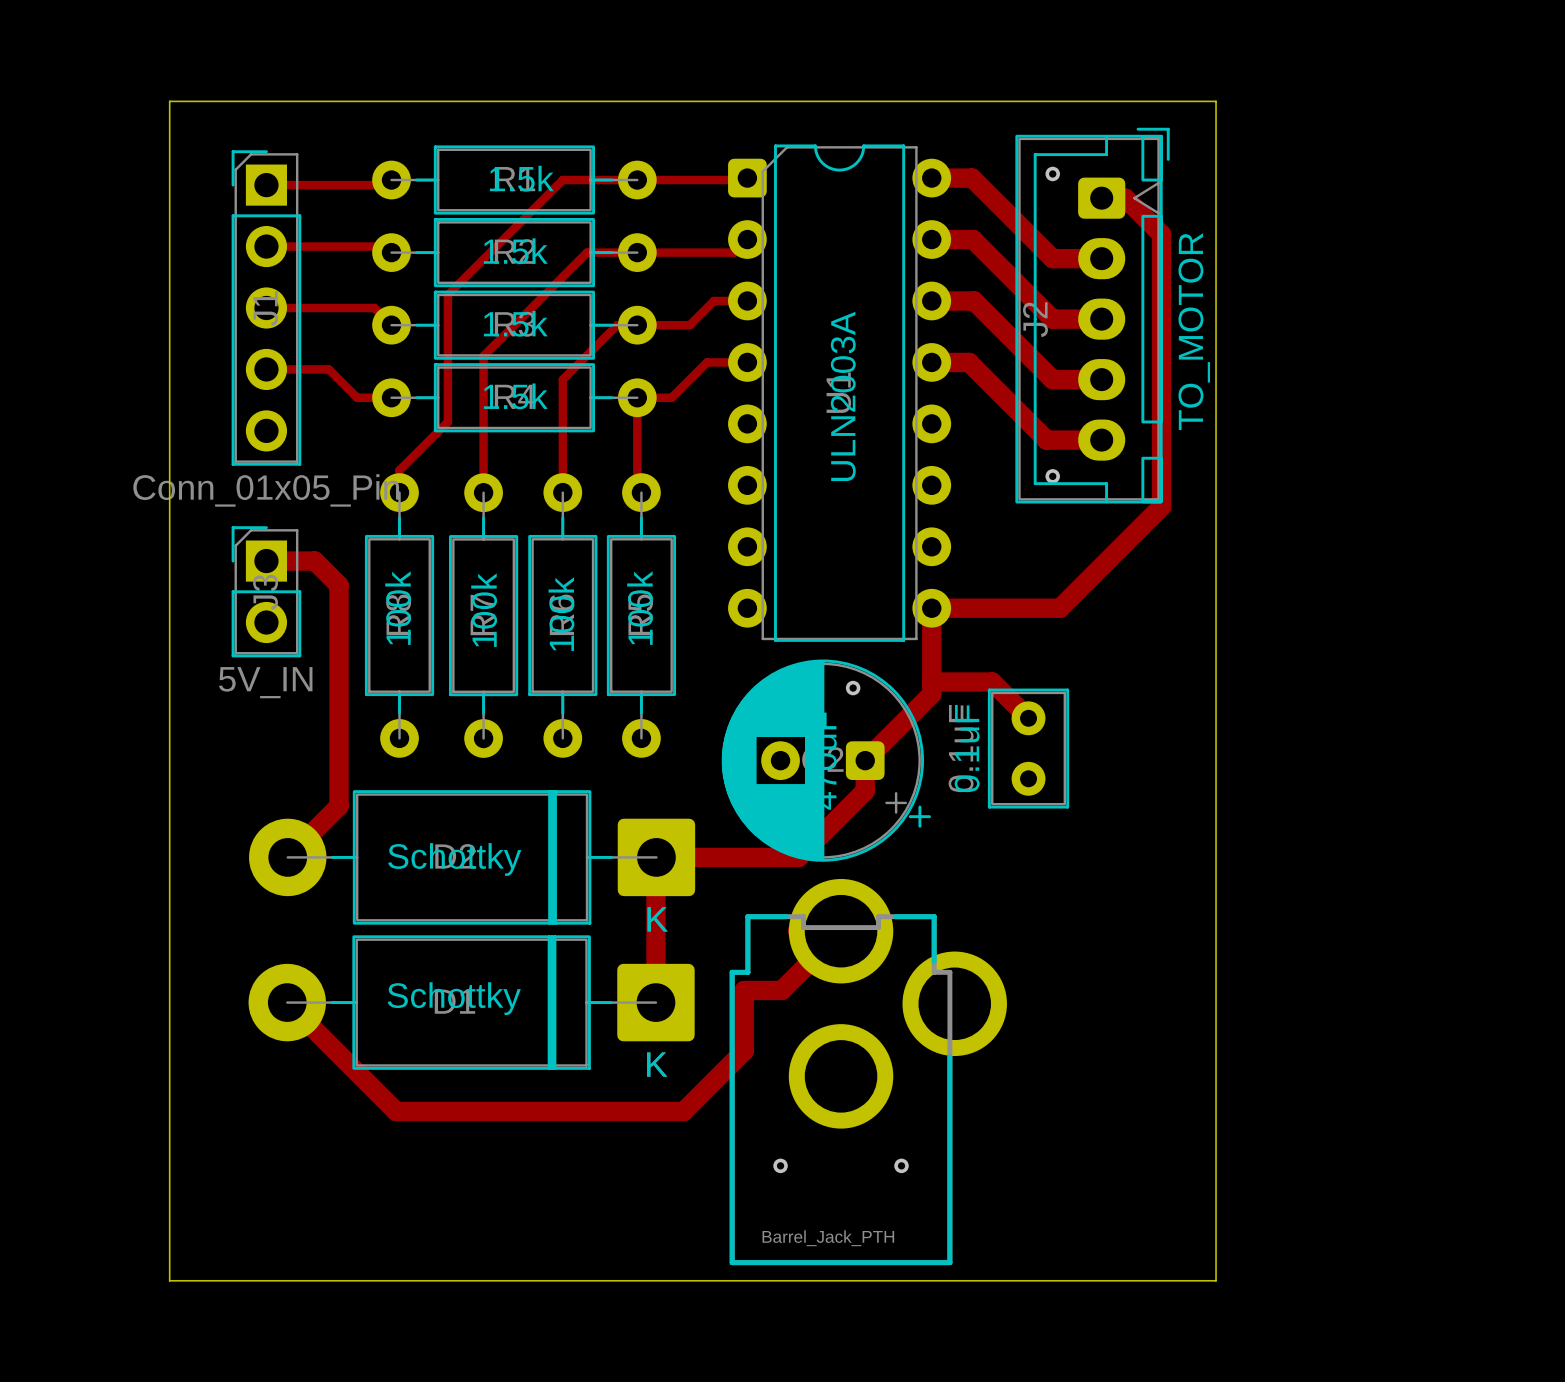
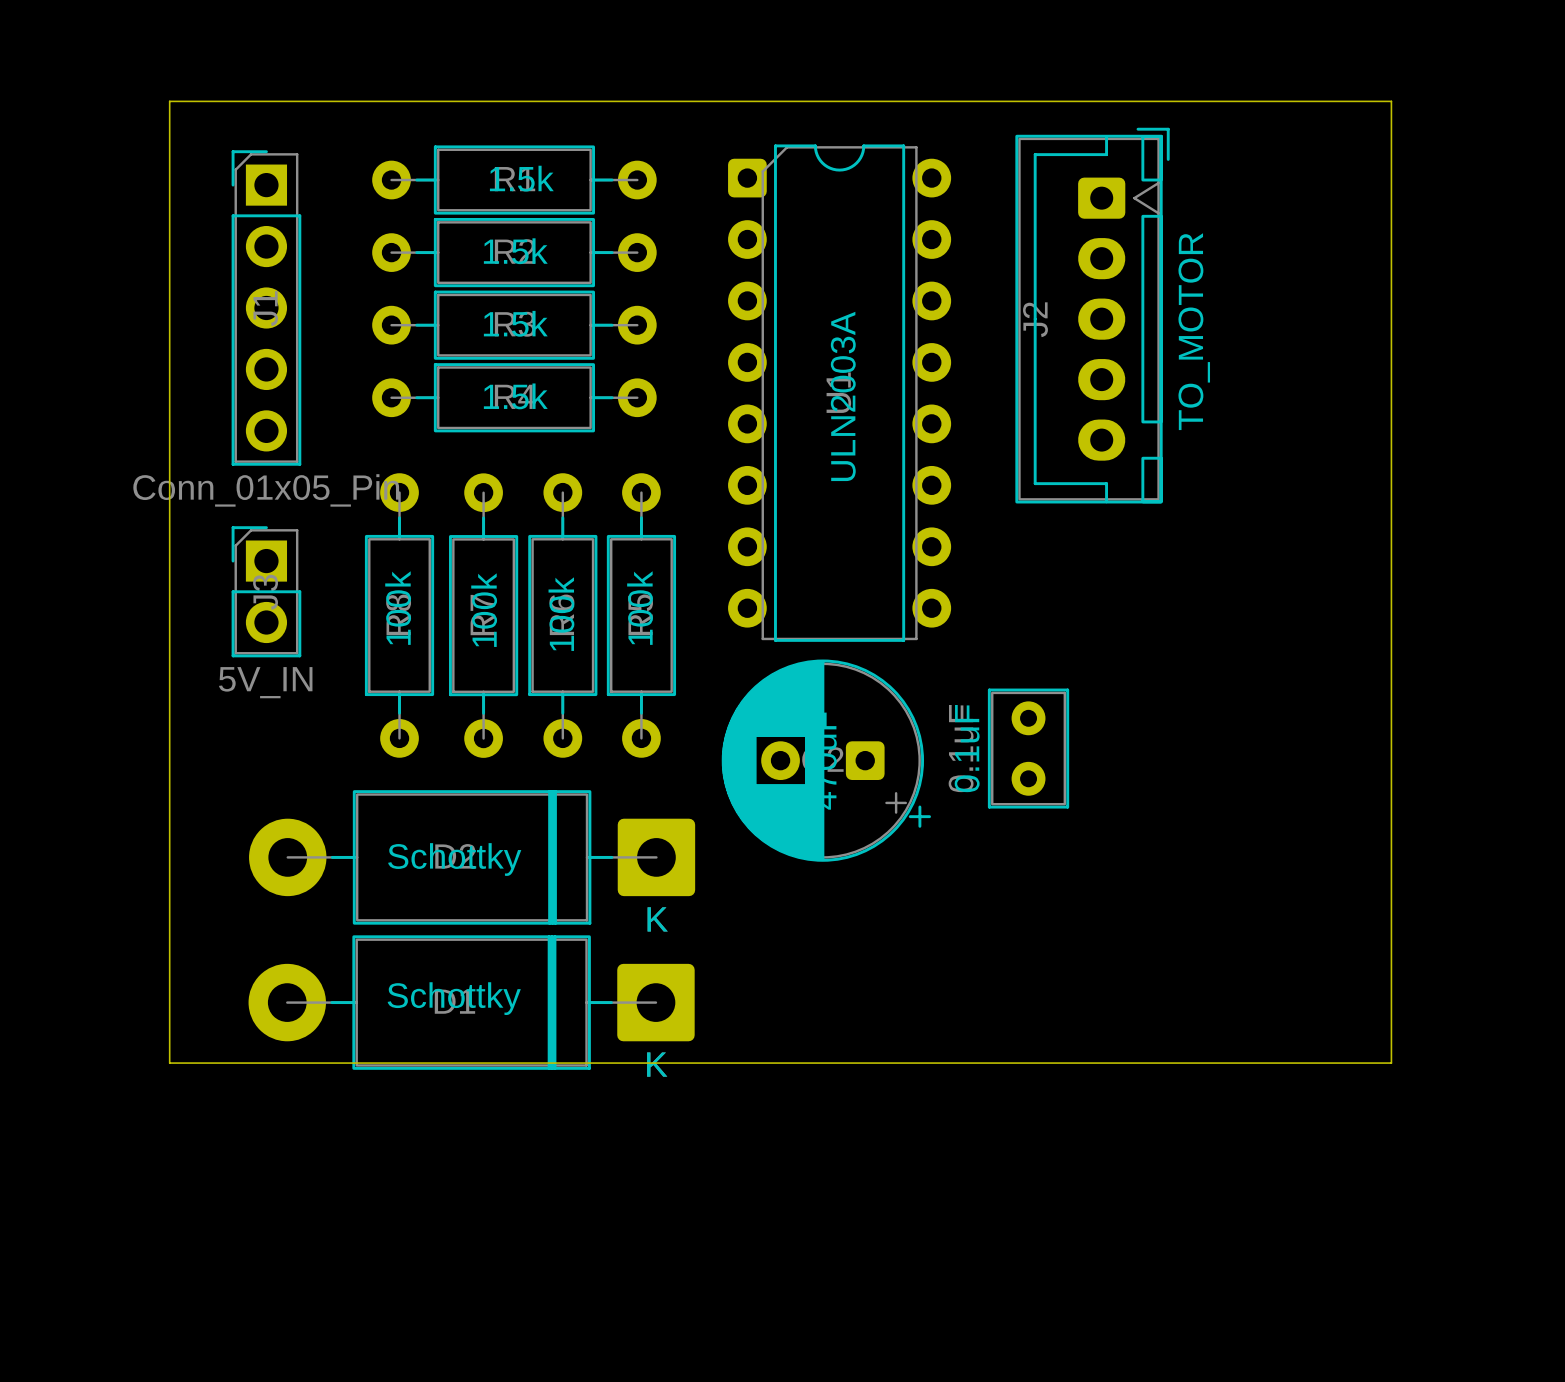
board edge: (1216, 101) (1216, 1280) (169, 1280) (169, 1063) -> (1216, 101) (1391, 101) (1391, 1063) (169, 1063)
via: (1052, 173) -> none
track: (747, 178) (745, 180) (562, 180) (447, 294) (447, 421) (399, 470) (399, 492) -> none
track: (931, 178) (972, 178) (1052, 258) (1101, 258) -> none
track: (391, 180) (386, 185) (266, 185) -> none
track: (1101, 198) (1125, 198) (1161, 234) (1161, 506) (1059, 608) (931, 608) (931, 694) (865, 760) (865, 790) (798, 857) (656, 857) (655, 1002) -> none
track: (747, 239) (734, 252) (587, 252) (483, 356) (483, 492) -> none
track: (931, 239) (973, 239) (1052, 319) (1101, 319) -> none
track: (266, 246) (385, 246) (391, 252) -> none
track: (747, 300) (714, 300) (689, 325) (617, 325) (562, 379) (562, 492) -> none
track: (931, 300) (974, 300) (1052, 379) (1101, 379) -> none
track: (266, 308) (374, 308) (391, 325) -> none
track: (747, 362) (707, 362) (671, 397) (637, 397) (637, 488) (641, 492) -> none
track: (931, 362) (969, 362) (1046, 440) (1101, 440) -> none
track: (266, 369) (328, 369) (357, 397) (391, 397) -> none
via: (1052, 476) -> none
track: (266, 561) (314, 561) (339, 585) (339, 806) (287, 857) (287, 824) -> none
track: (931, 682) (992, 682) (1028, 718) -> none
via: (853, 688) -> none
track: (797, 931) (841, 931) (781, 990) (744, 990) (744, 1050) (683, 1111) (396, 1111) (287, 1002) -> none
part: Barrel_Jack_PTH (868, 1072) -> none
via: (780, 1165) -> none
via: (901, 1165) -> none

